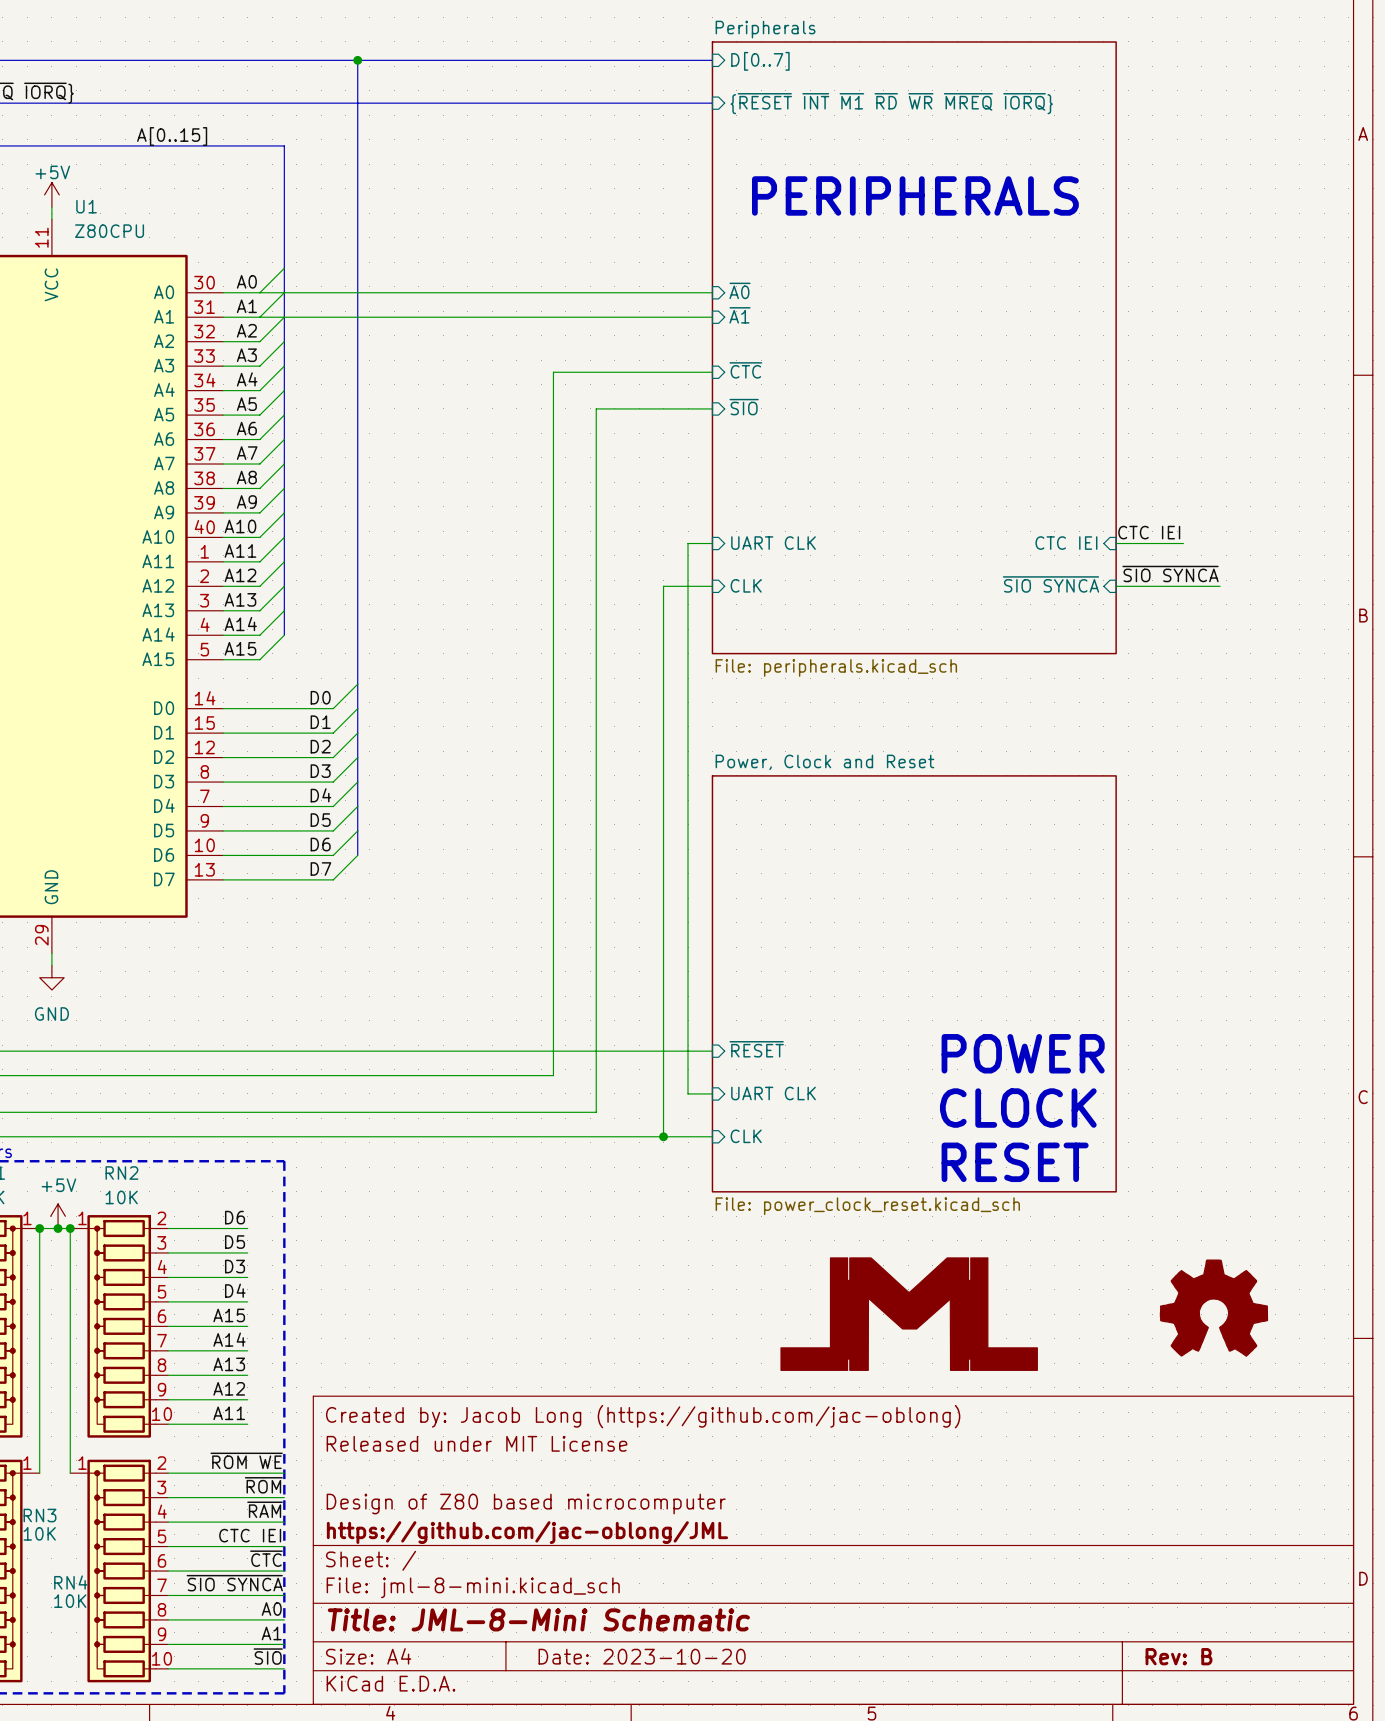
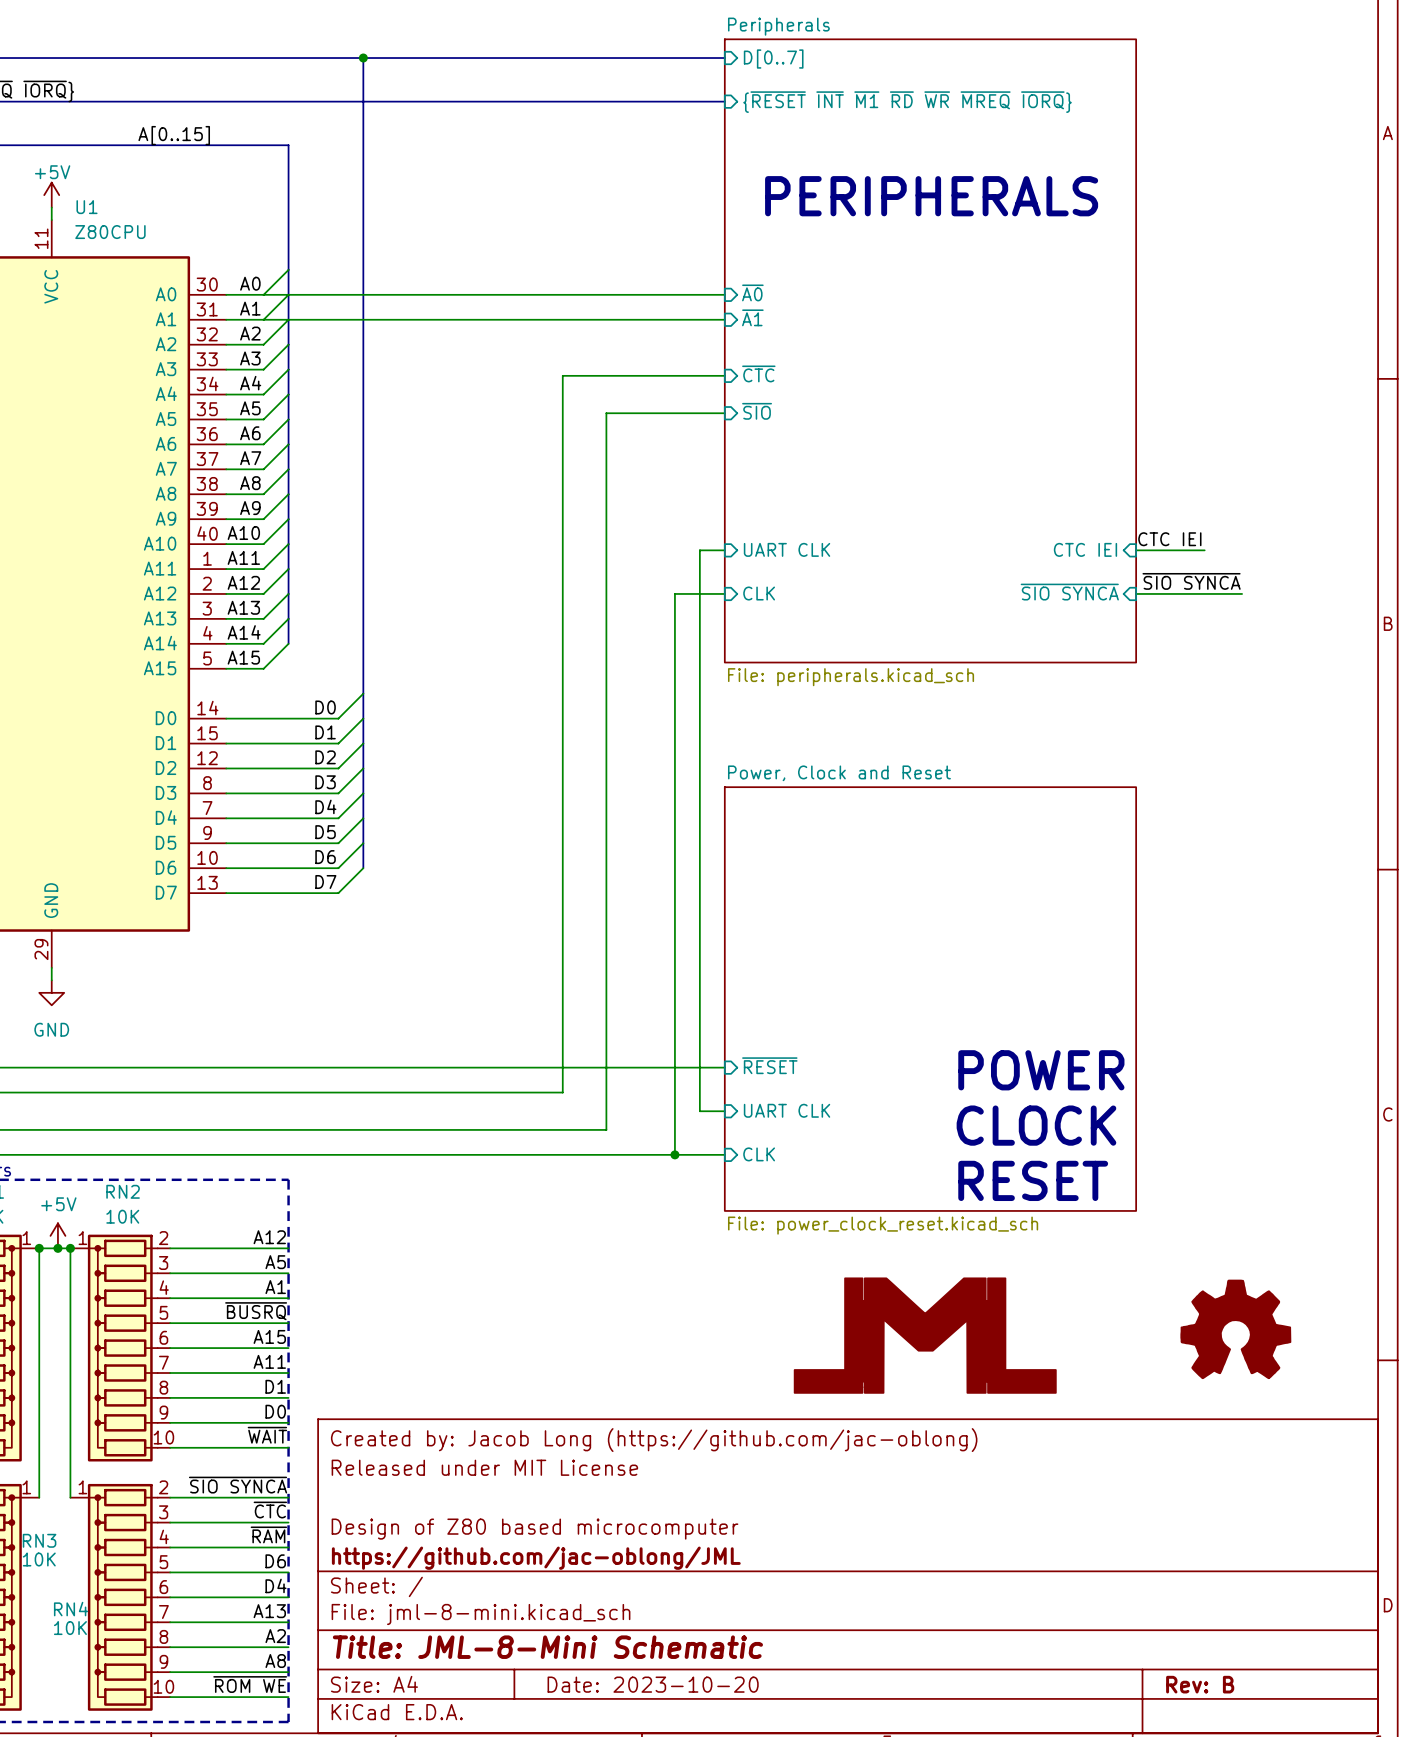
label: D6 (235, 1217) -> none
wire: none -> (251, 1248) (288, 1248)
label: D5 (235, 1242) -> none
label: none -> A5 (275, 1262)
wire: none -> (251, 1273) (288, 1273)
label: D3 (235, 1266) -> none
label: none -> A1 (275, 1287)
wire: none -> (251, 1298) (288, 1298)
label: D4 (235, 1290) -> none
label: none -> ~{BUSRQ} (256, 1311)
wire: none -> (251, 1323) (288, 1323)
label position: A15 (229, 1315) -> A15 (269, 1336)
wire: none -> (251, 1348) (288, 1348)
label: A14 (229, 1339) -> none
wire: none -> (251, 1373) (288, 1373)
label: A13 (229, 1364) -> none
label: none -> D1 (275, 1386)
wire: none -> (251, 1397) (288, 1397)
label position: A12 (229, 1388) -> A12 (269, 1237)
label: none -> D0 (275, 1411)
wire: none -> (251, 1422) (288, 1422)
label: none -> ~{WAIT} (267, 1435)
label position: A11 (229, 1413) -> A11 (269, 1361)
wire: none -> (251, 1447) (288, 1447)
label: ~{ROM WE} (246, 1460) -> ~{SIO SYNCA} (238, 1485)
label: ~{ROM} (263, 1485) -> ~{CTC} (270, 1510)
label: CTC IEI (250, 1535) -> D6 (275, 1561)
label: ~{CTC} (266, 1558) -> D4 (275, 1585)
label: ~{SIO SYNCA} (234, 1583) -> A13 (269, 1611)
label: A0 (271, 1609) -> A2 (275, 1636)
label: A1 (271, 1633) -> A8 (275, 1661)
label: ~{SIO} (268, 1656) -> ~{ROM WE} (250, 1684)

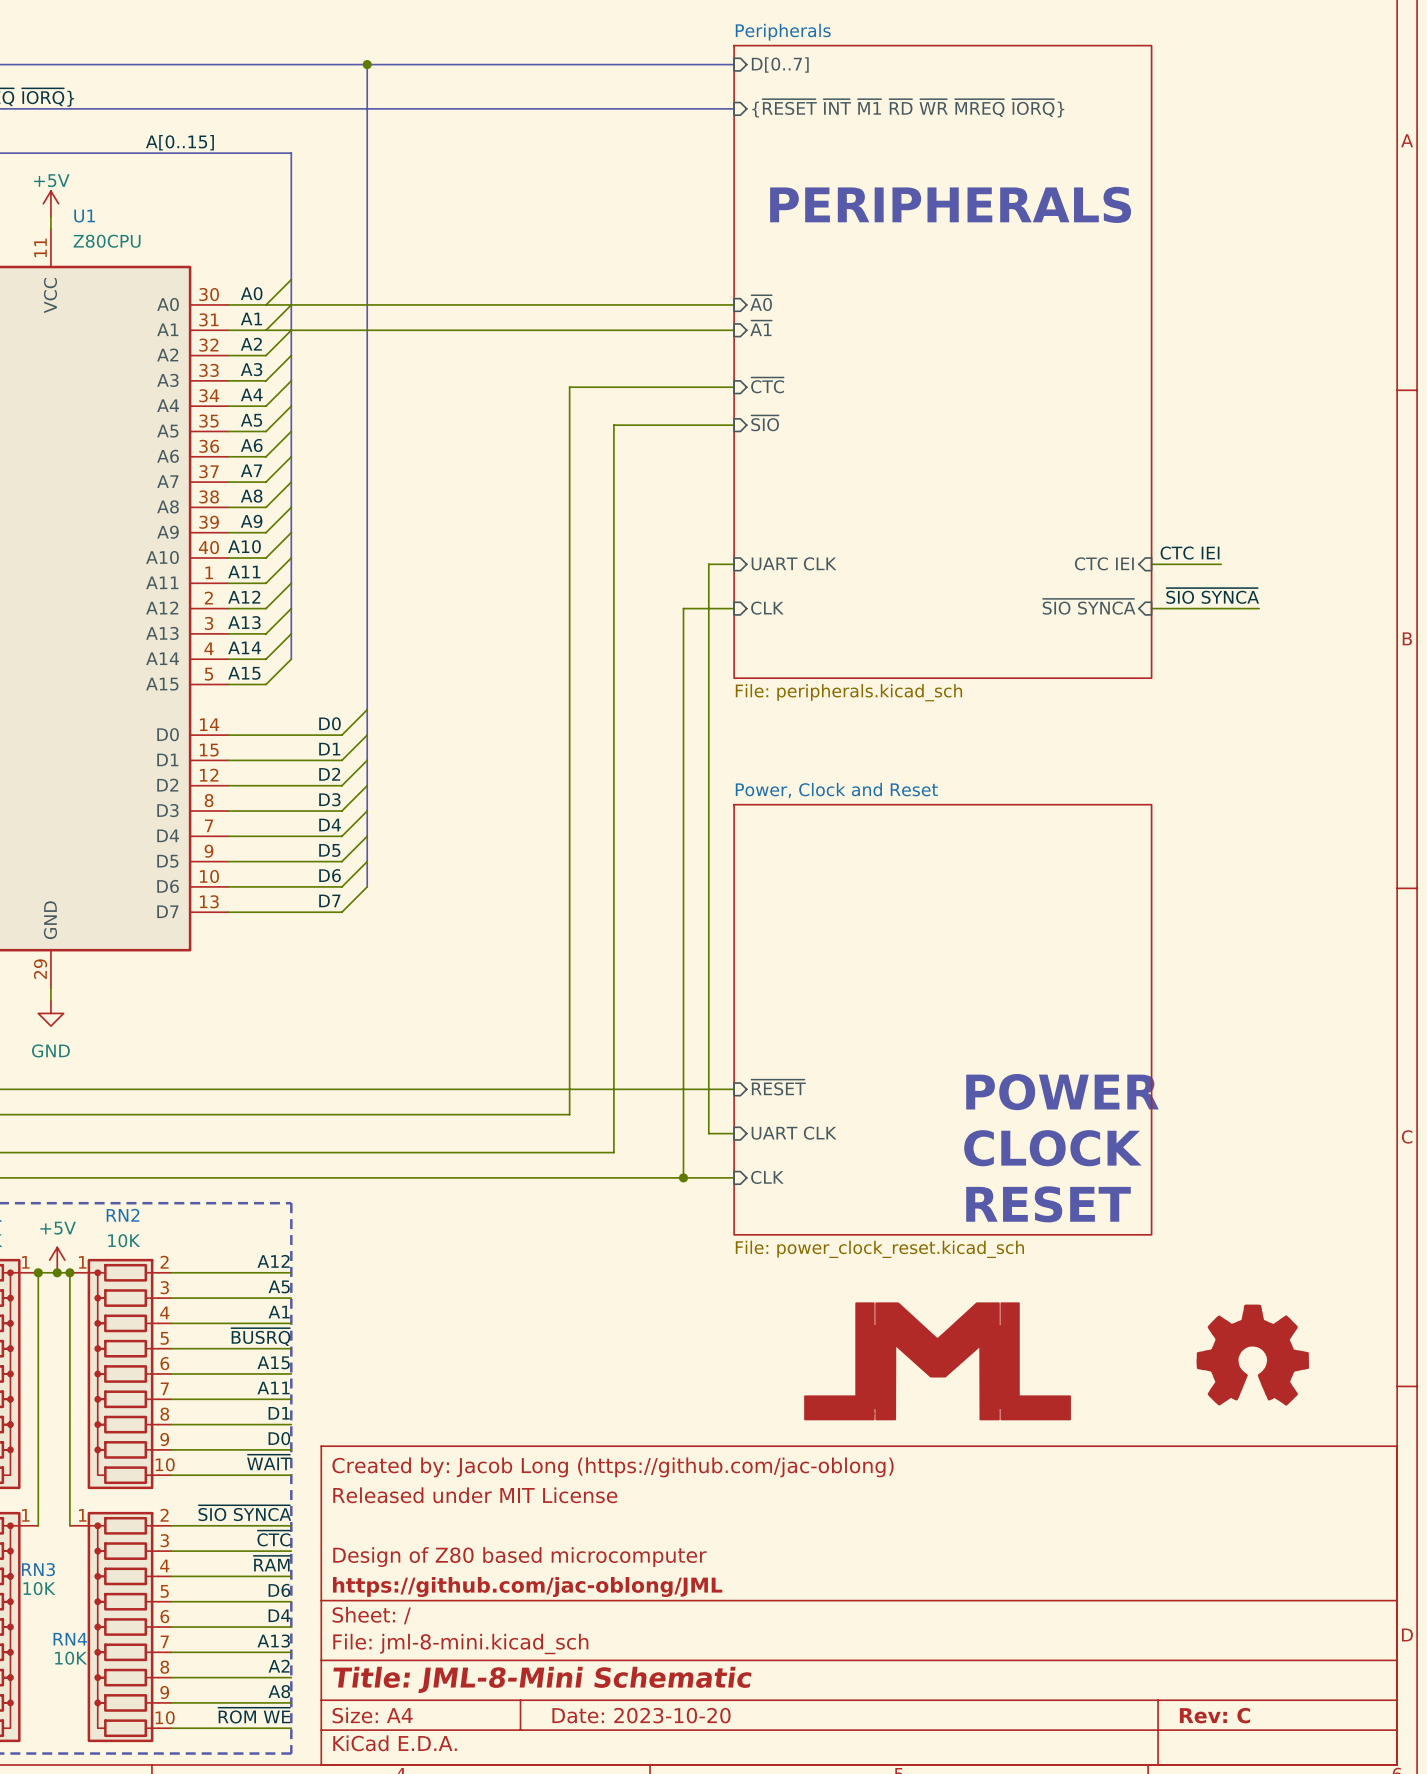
title block: Rev: B (1200, 1684) -> Rev: C (1214, 1715)

